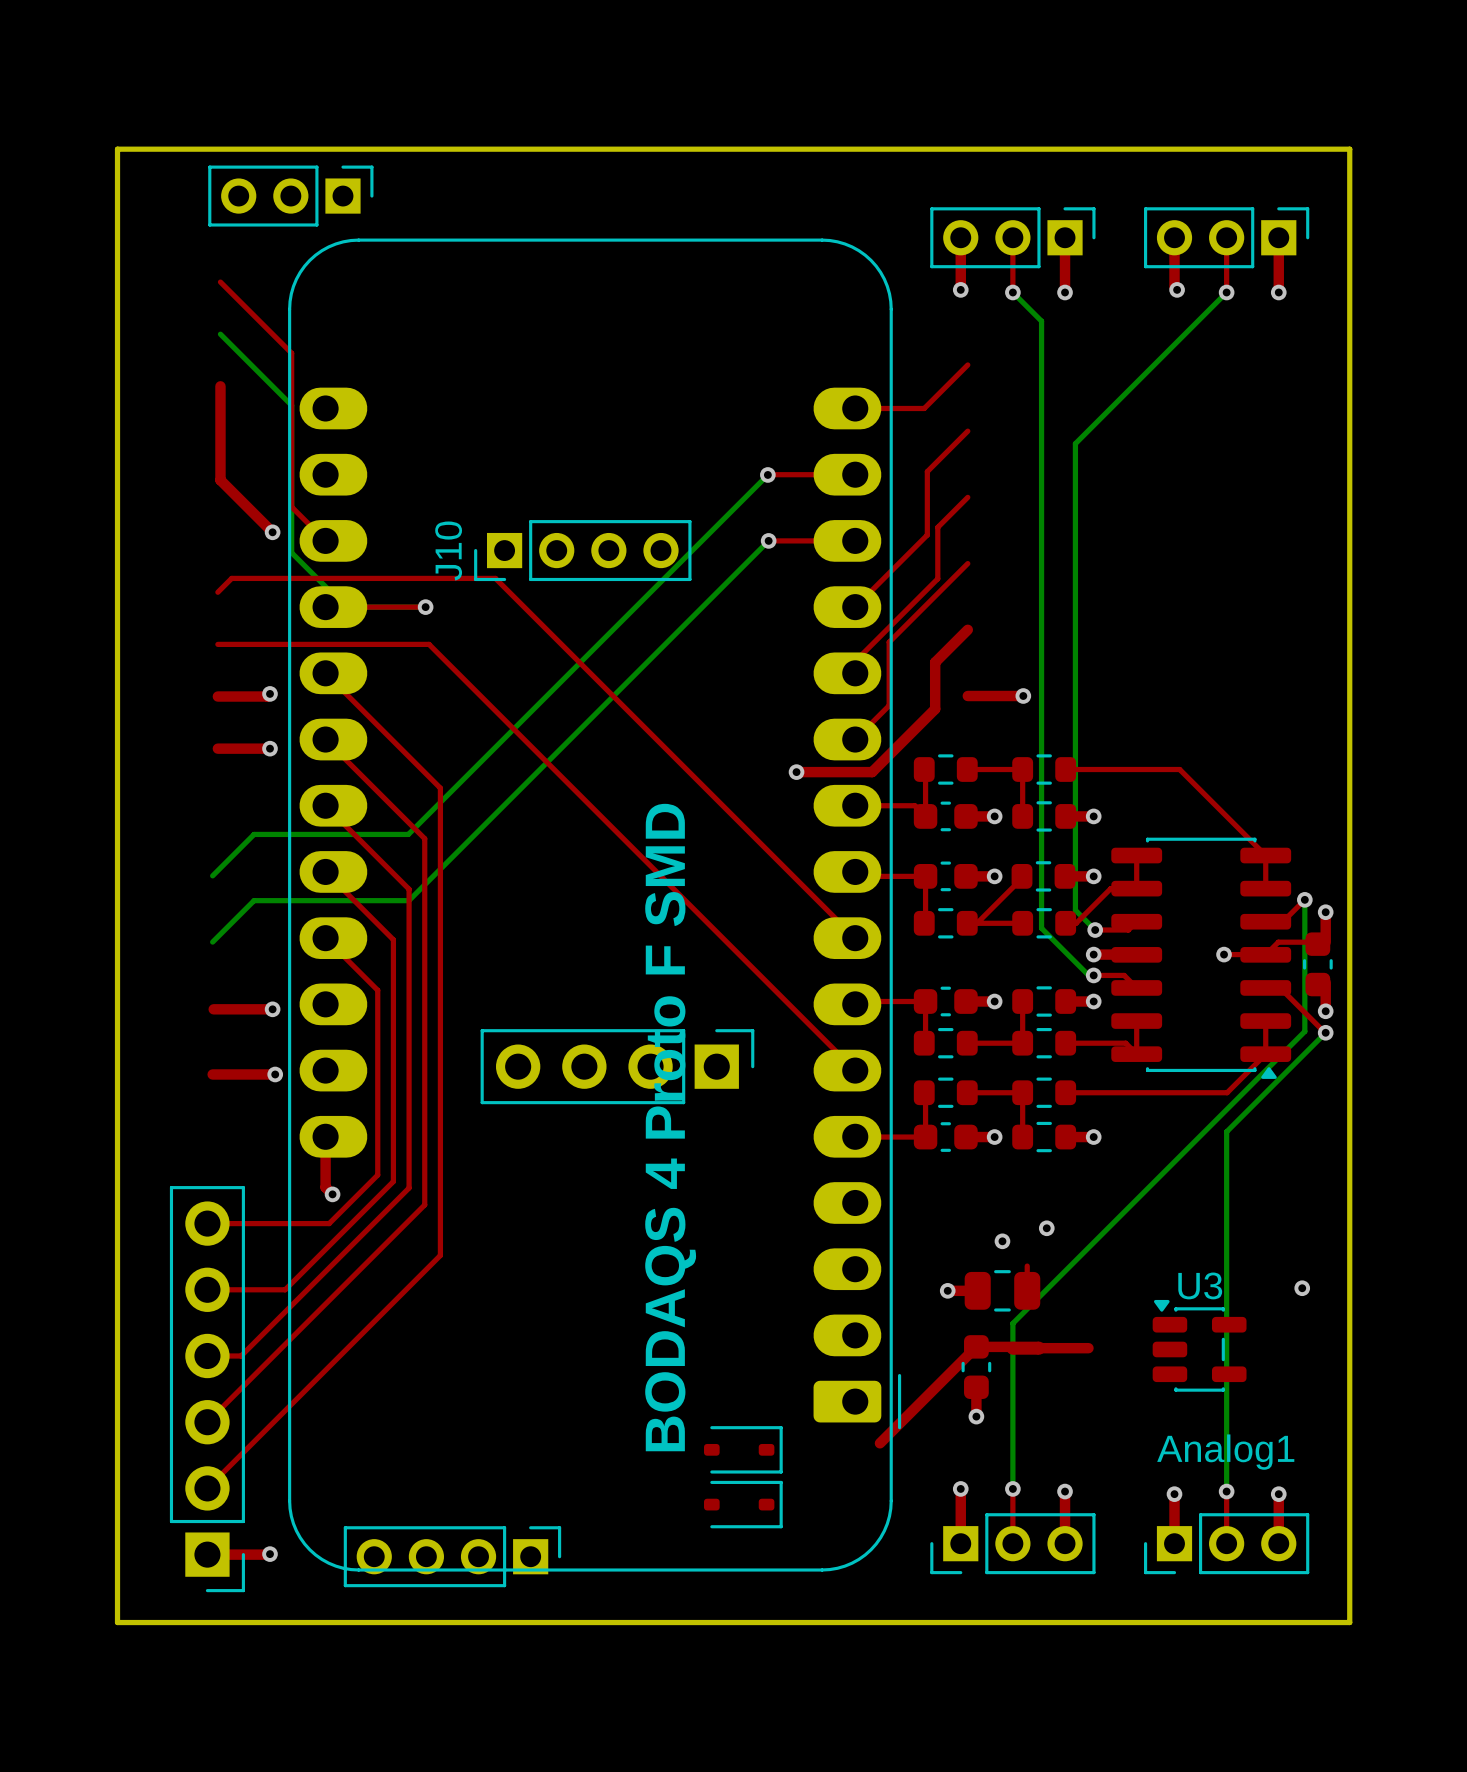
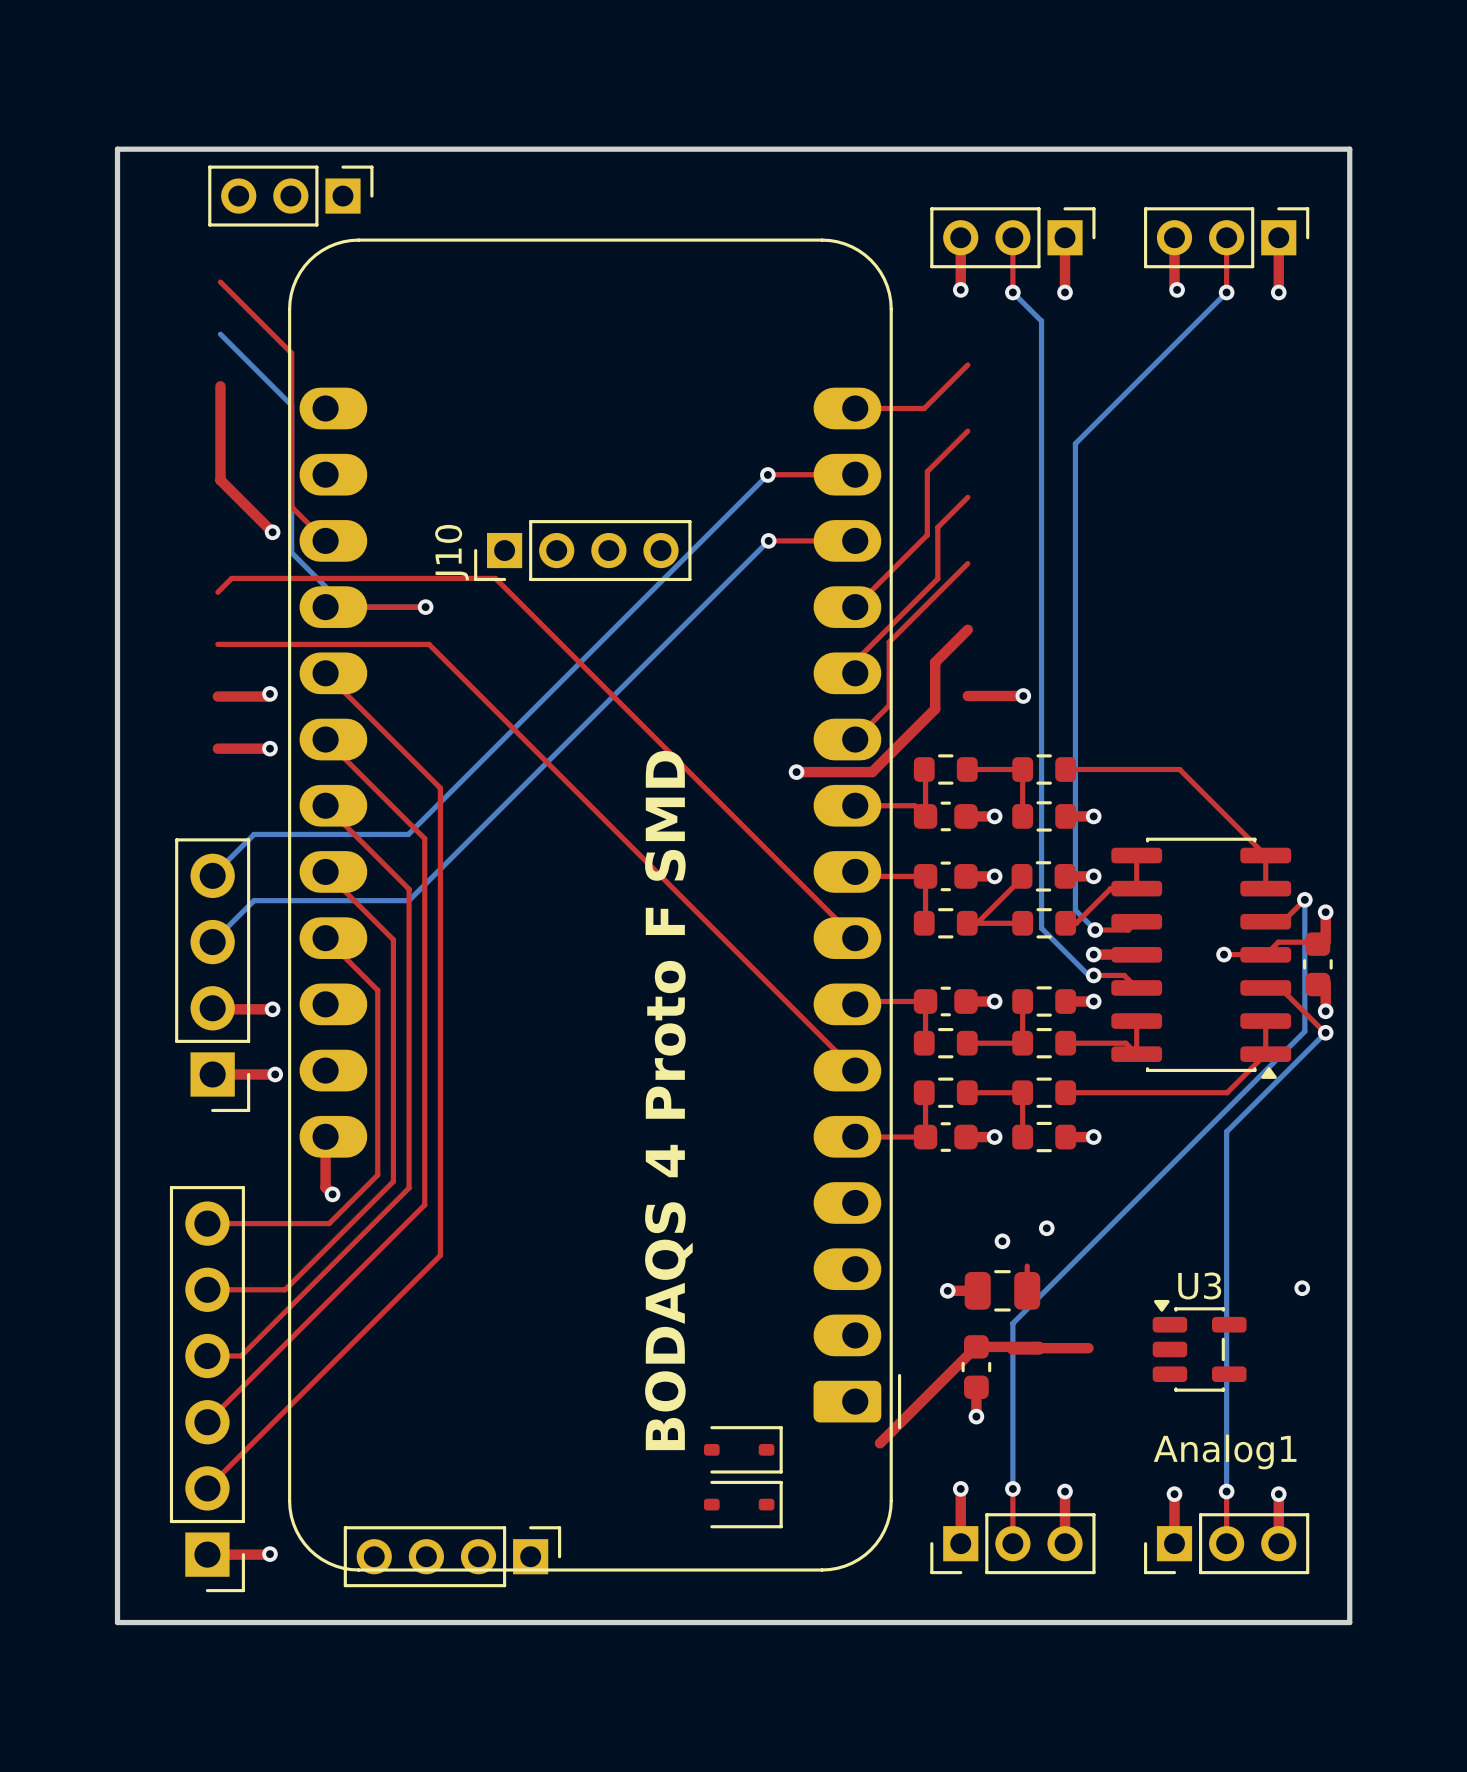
part rotation: 0° (617, 1066) -> 90° clockwise (212, 975)
part position: (617, 1066) -> (212, 975)

